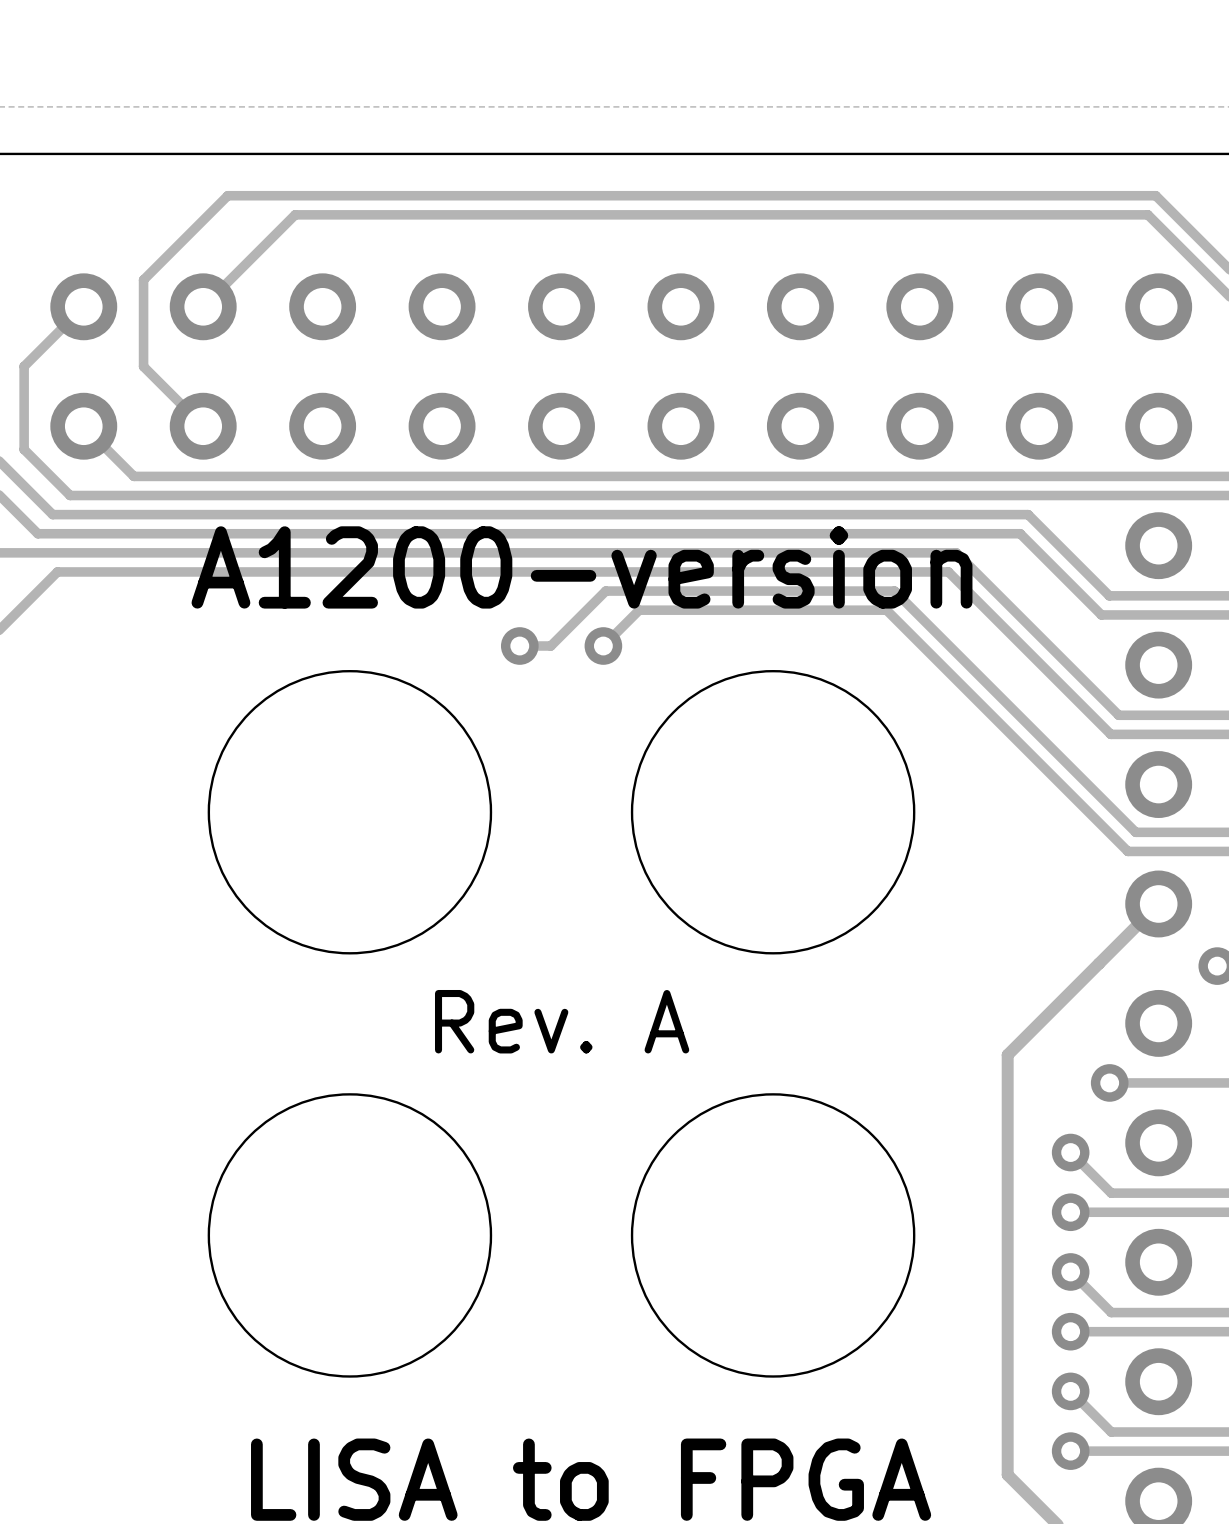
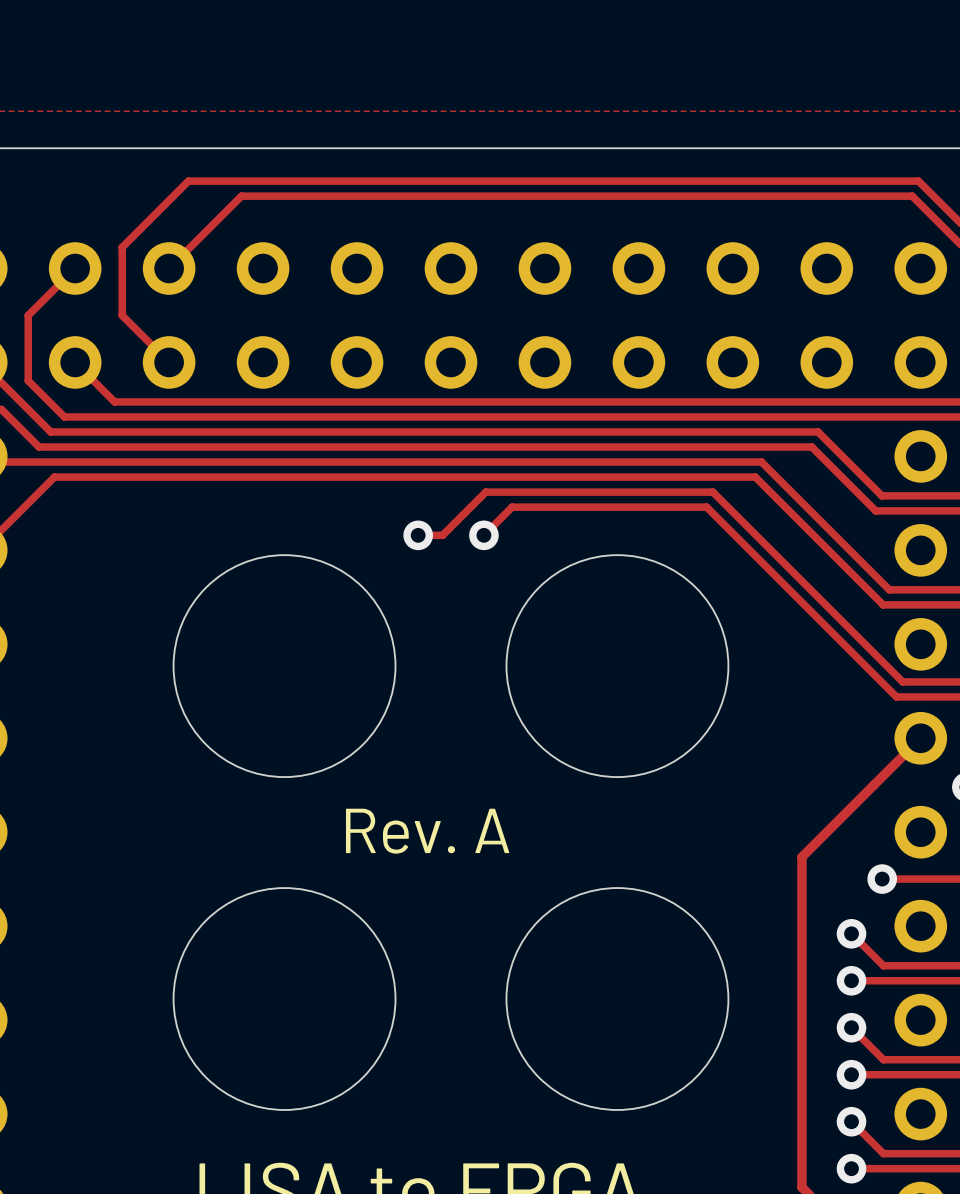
text: A1200-version (582, 567) -> none

